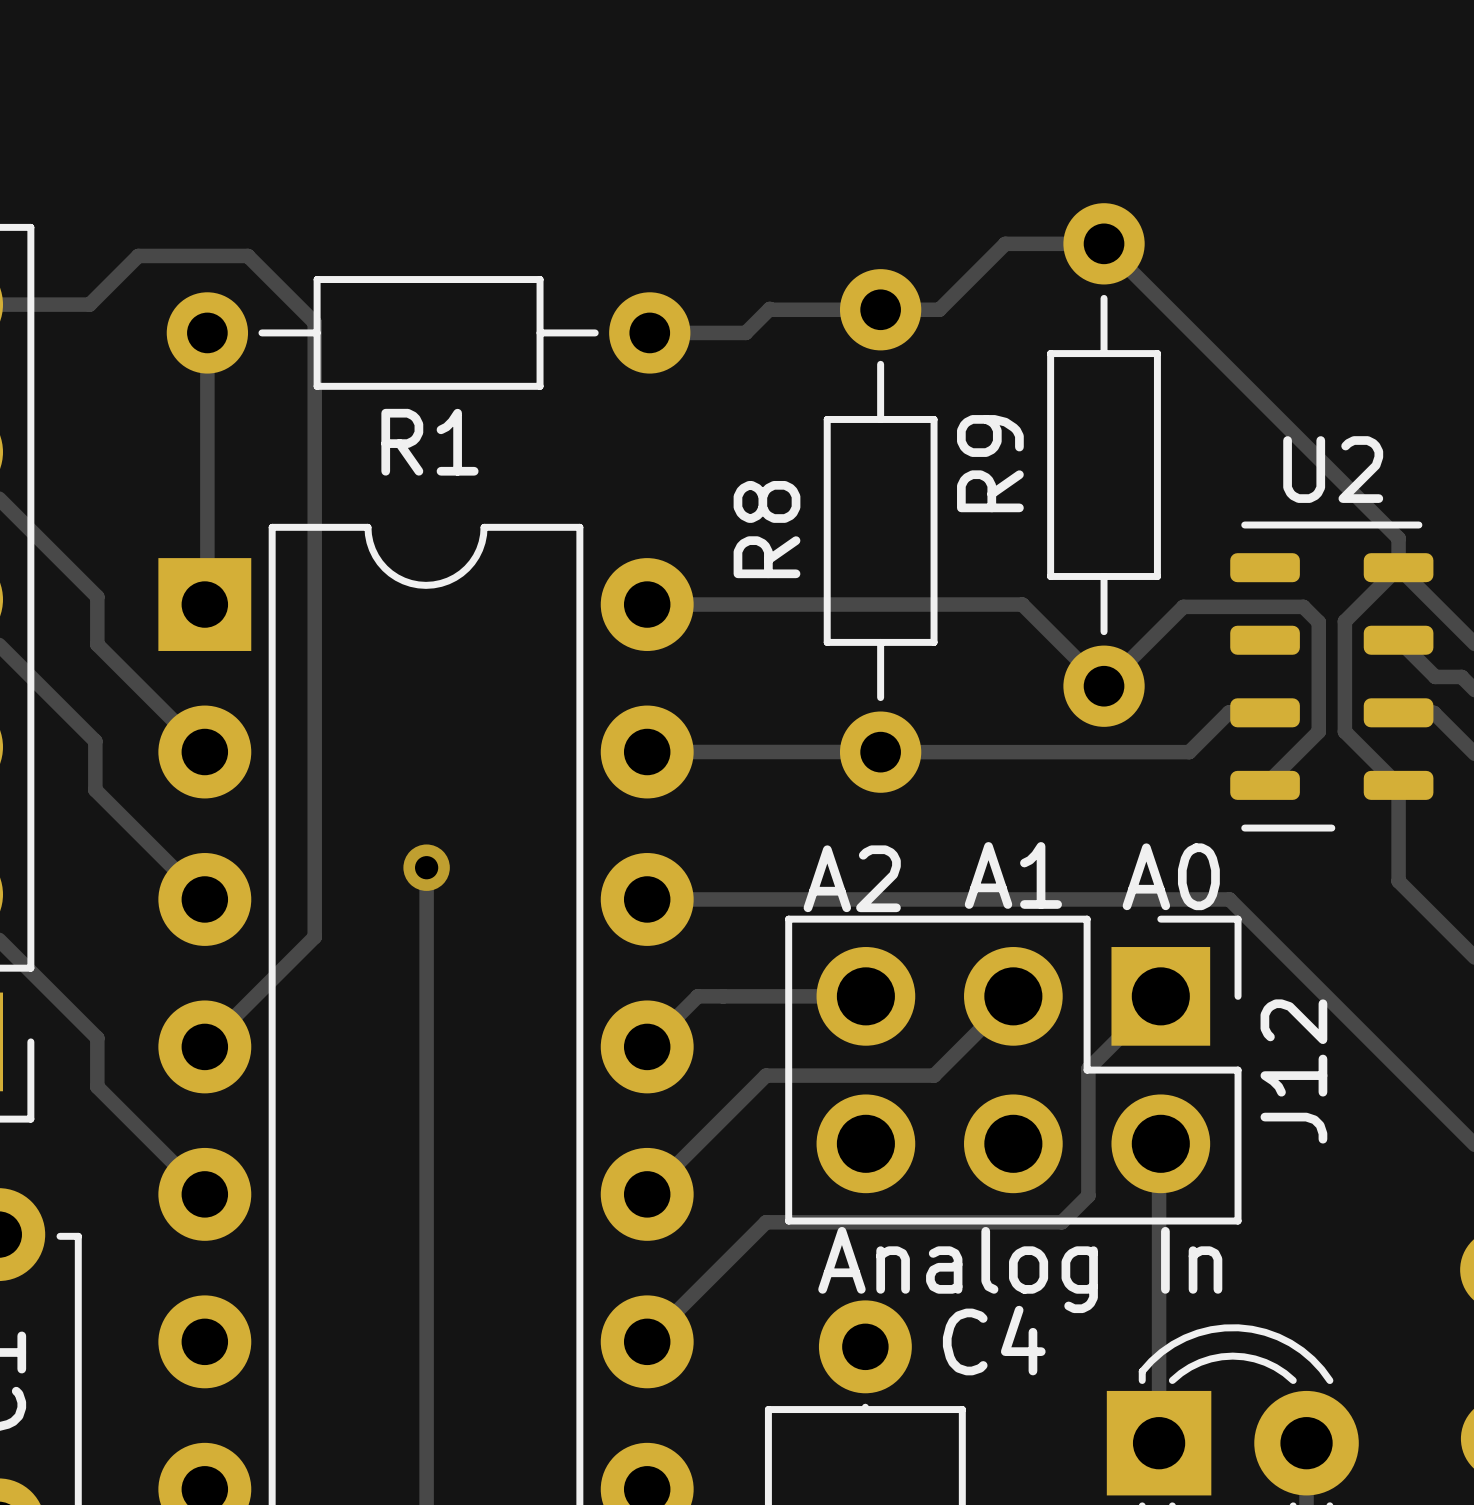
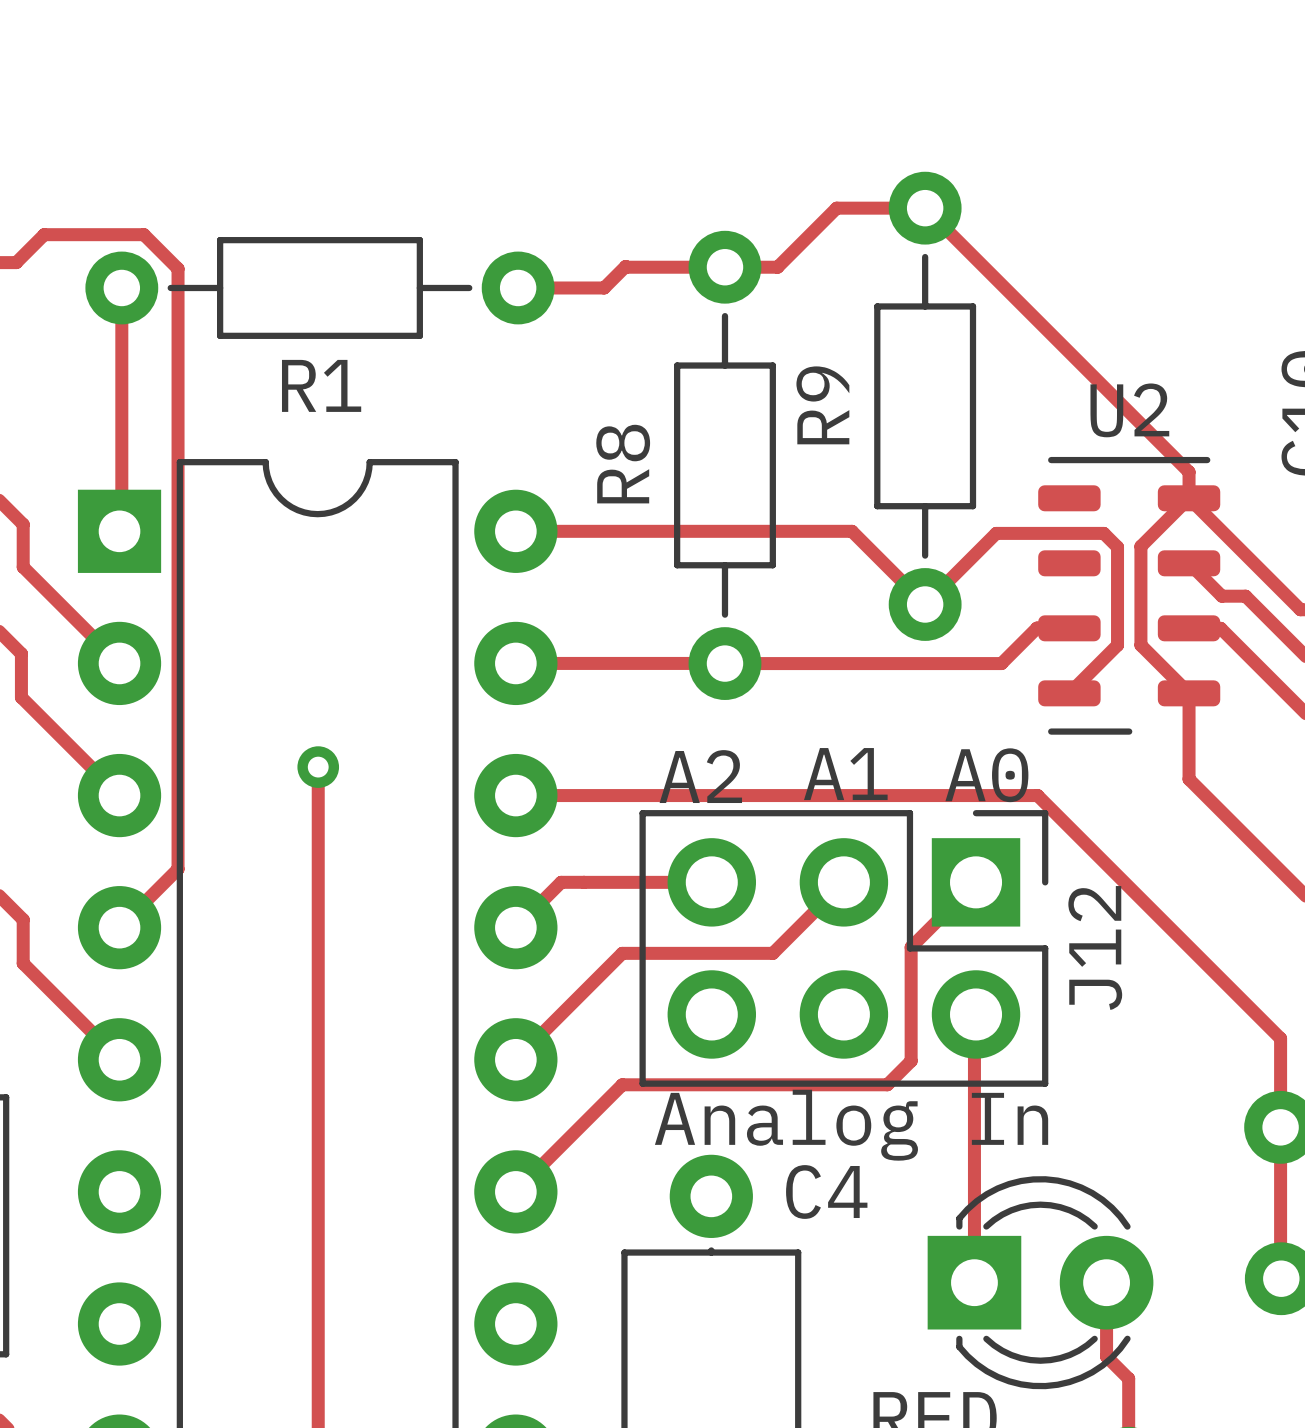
track: (120, 273) (138, 255) (247, 255) (314, 322) (314, 937) (270, 981) -> (44, 234) (143, 234) (178, 268) (178, 869)

